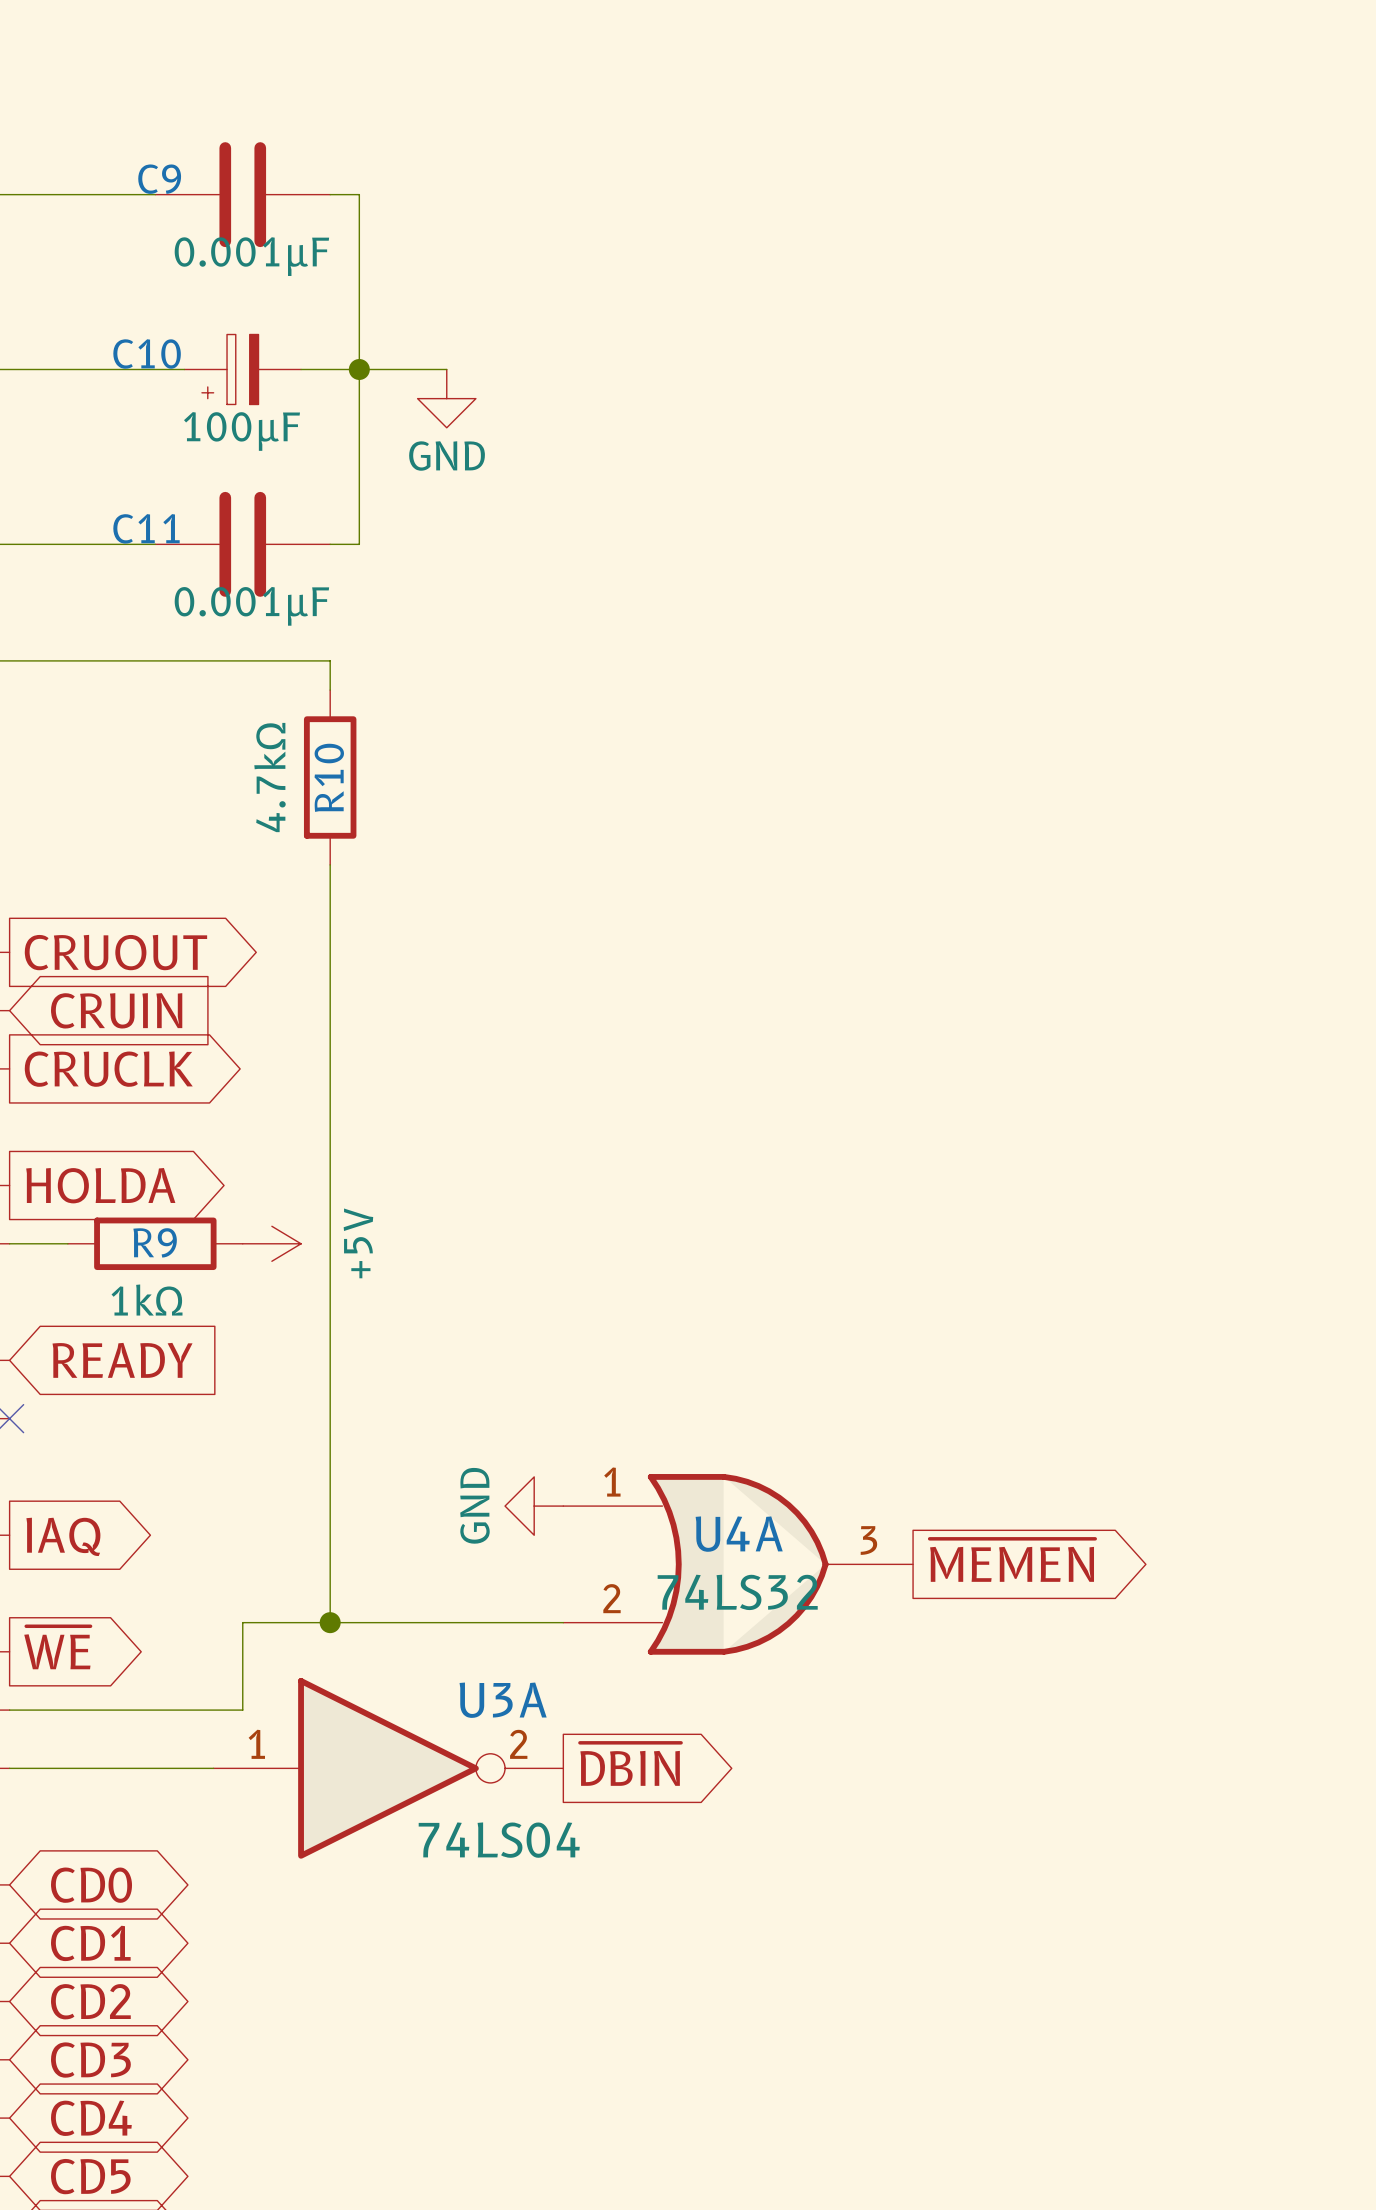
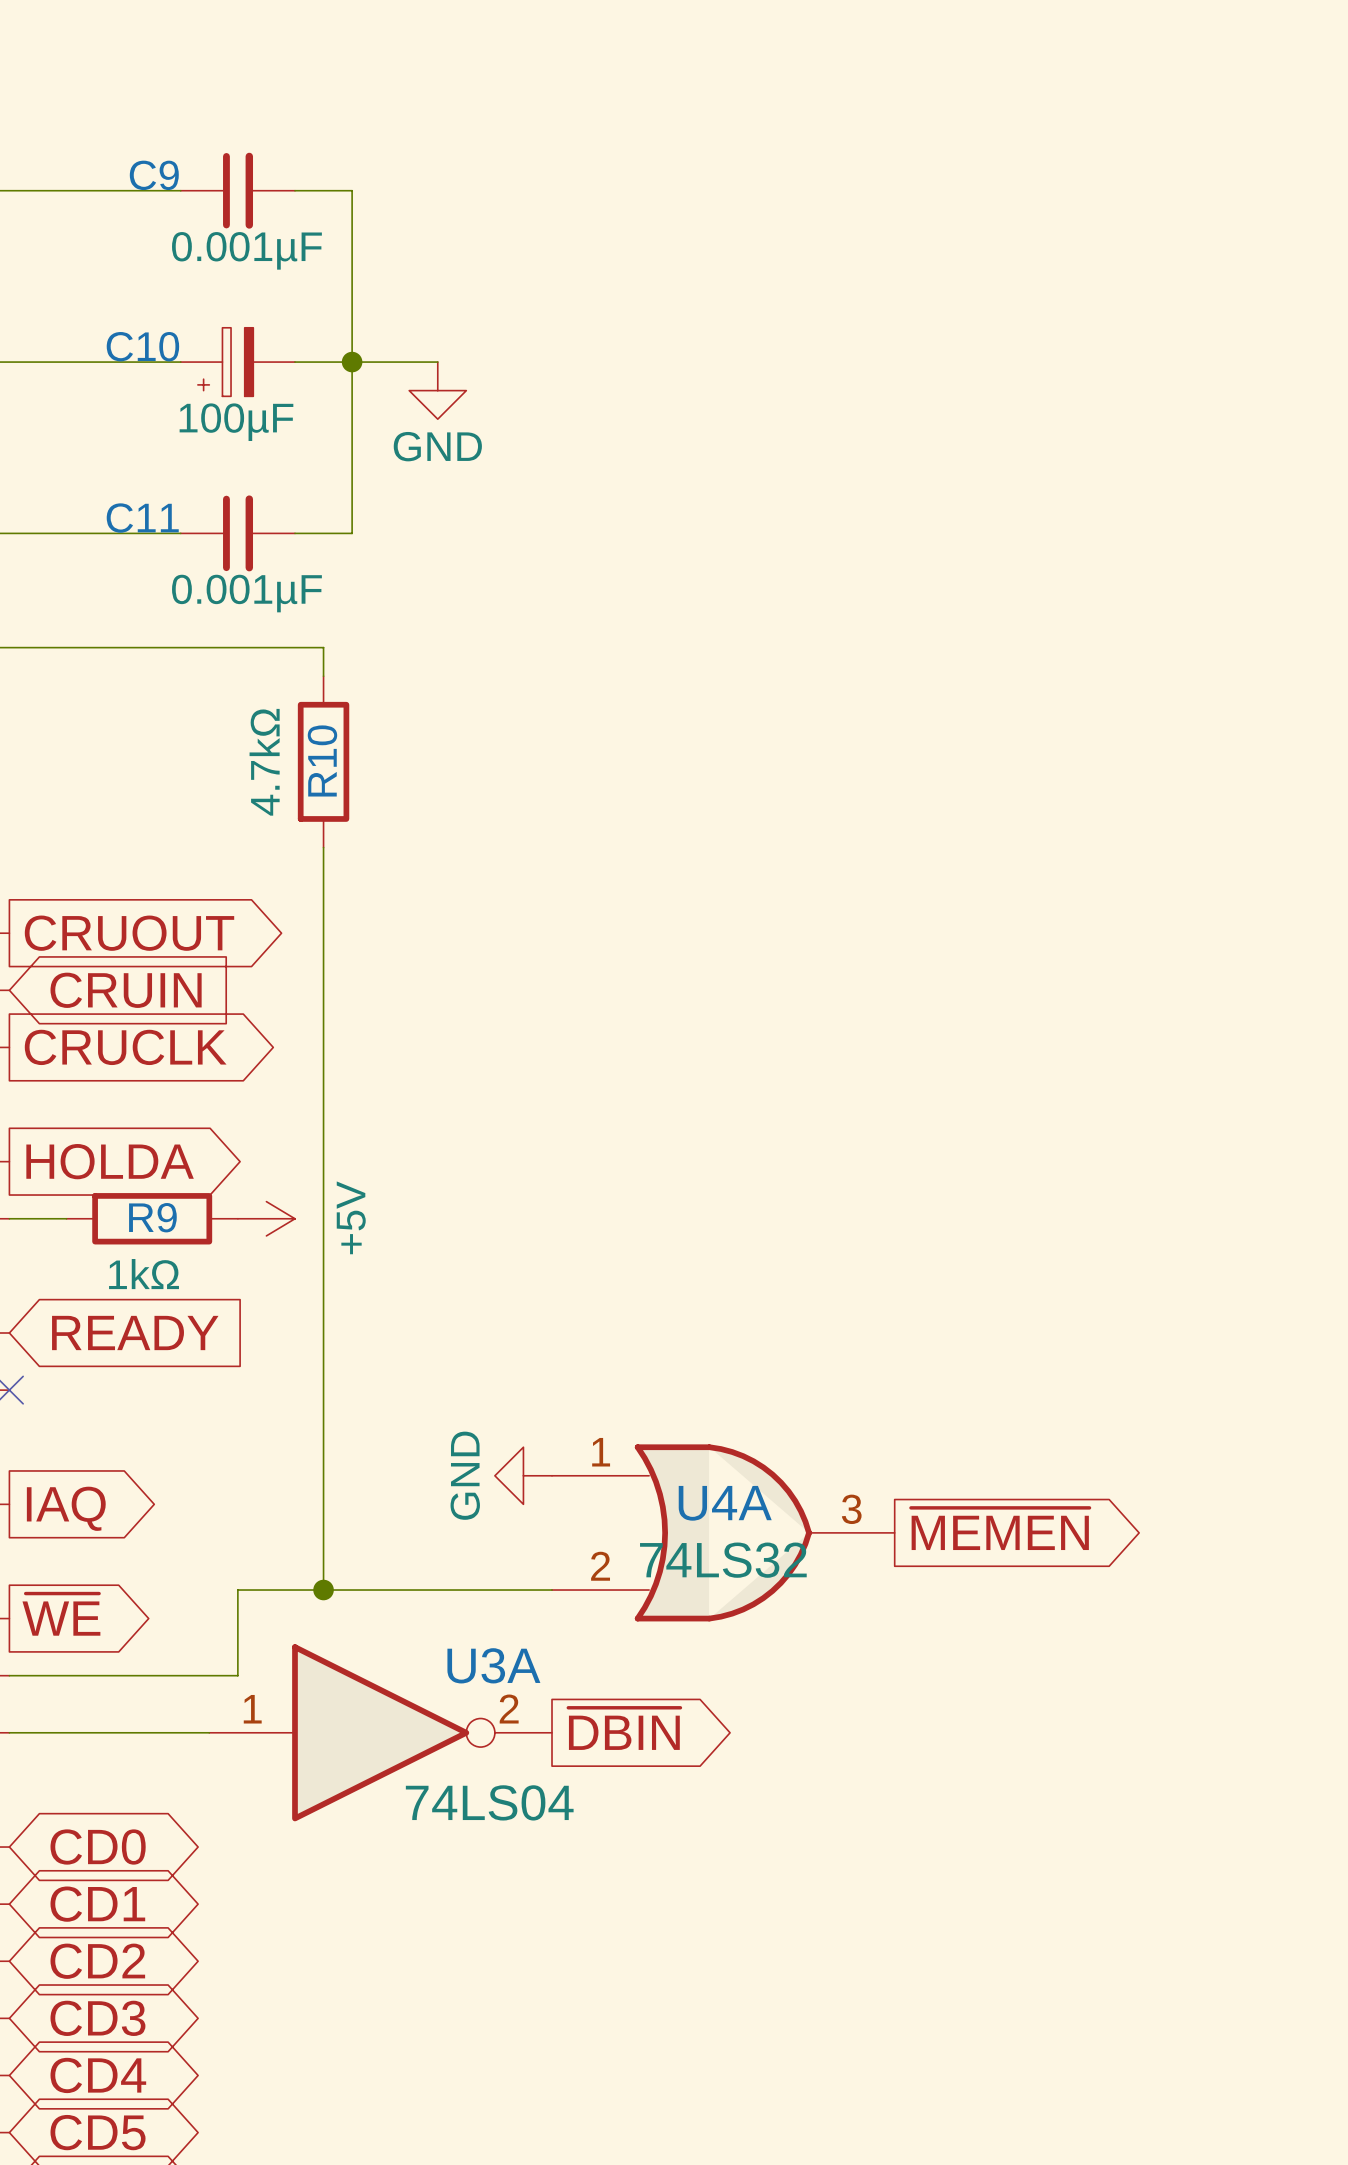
C9 symbol: [155, 142, 331, 248] -> [180, 152, 295, 229]
C11 symbol: [155, 491, 331, 597] -> [180, 495, 295, 572]

